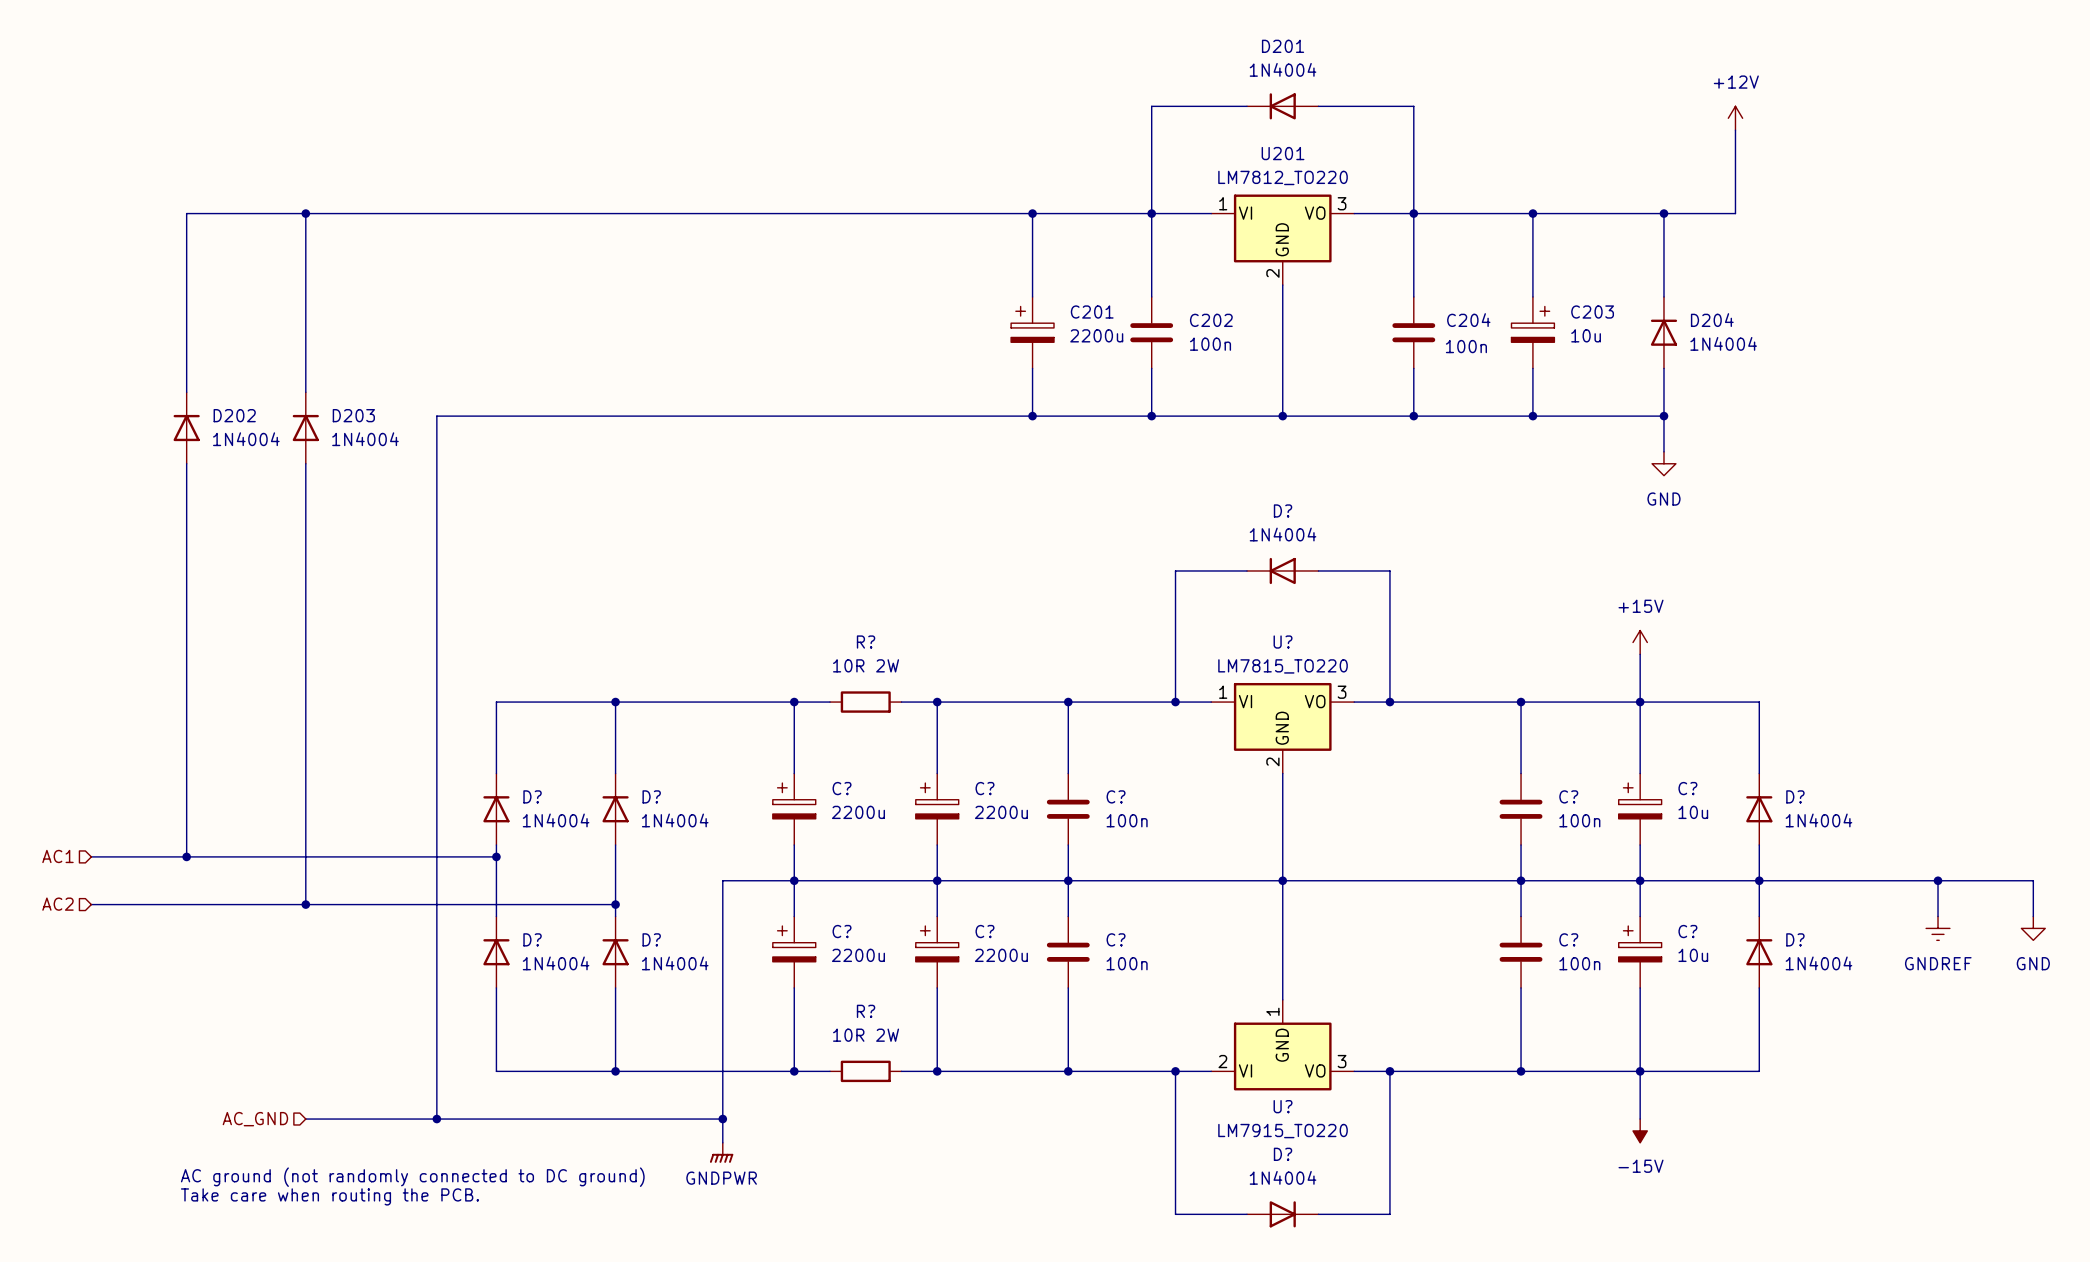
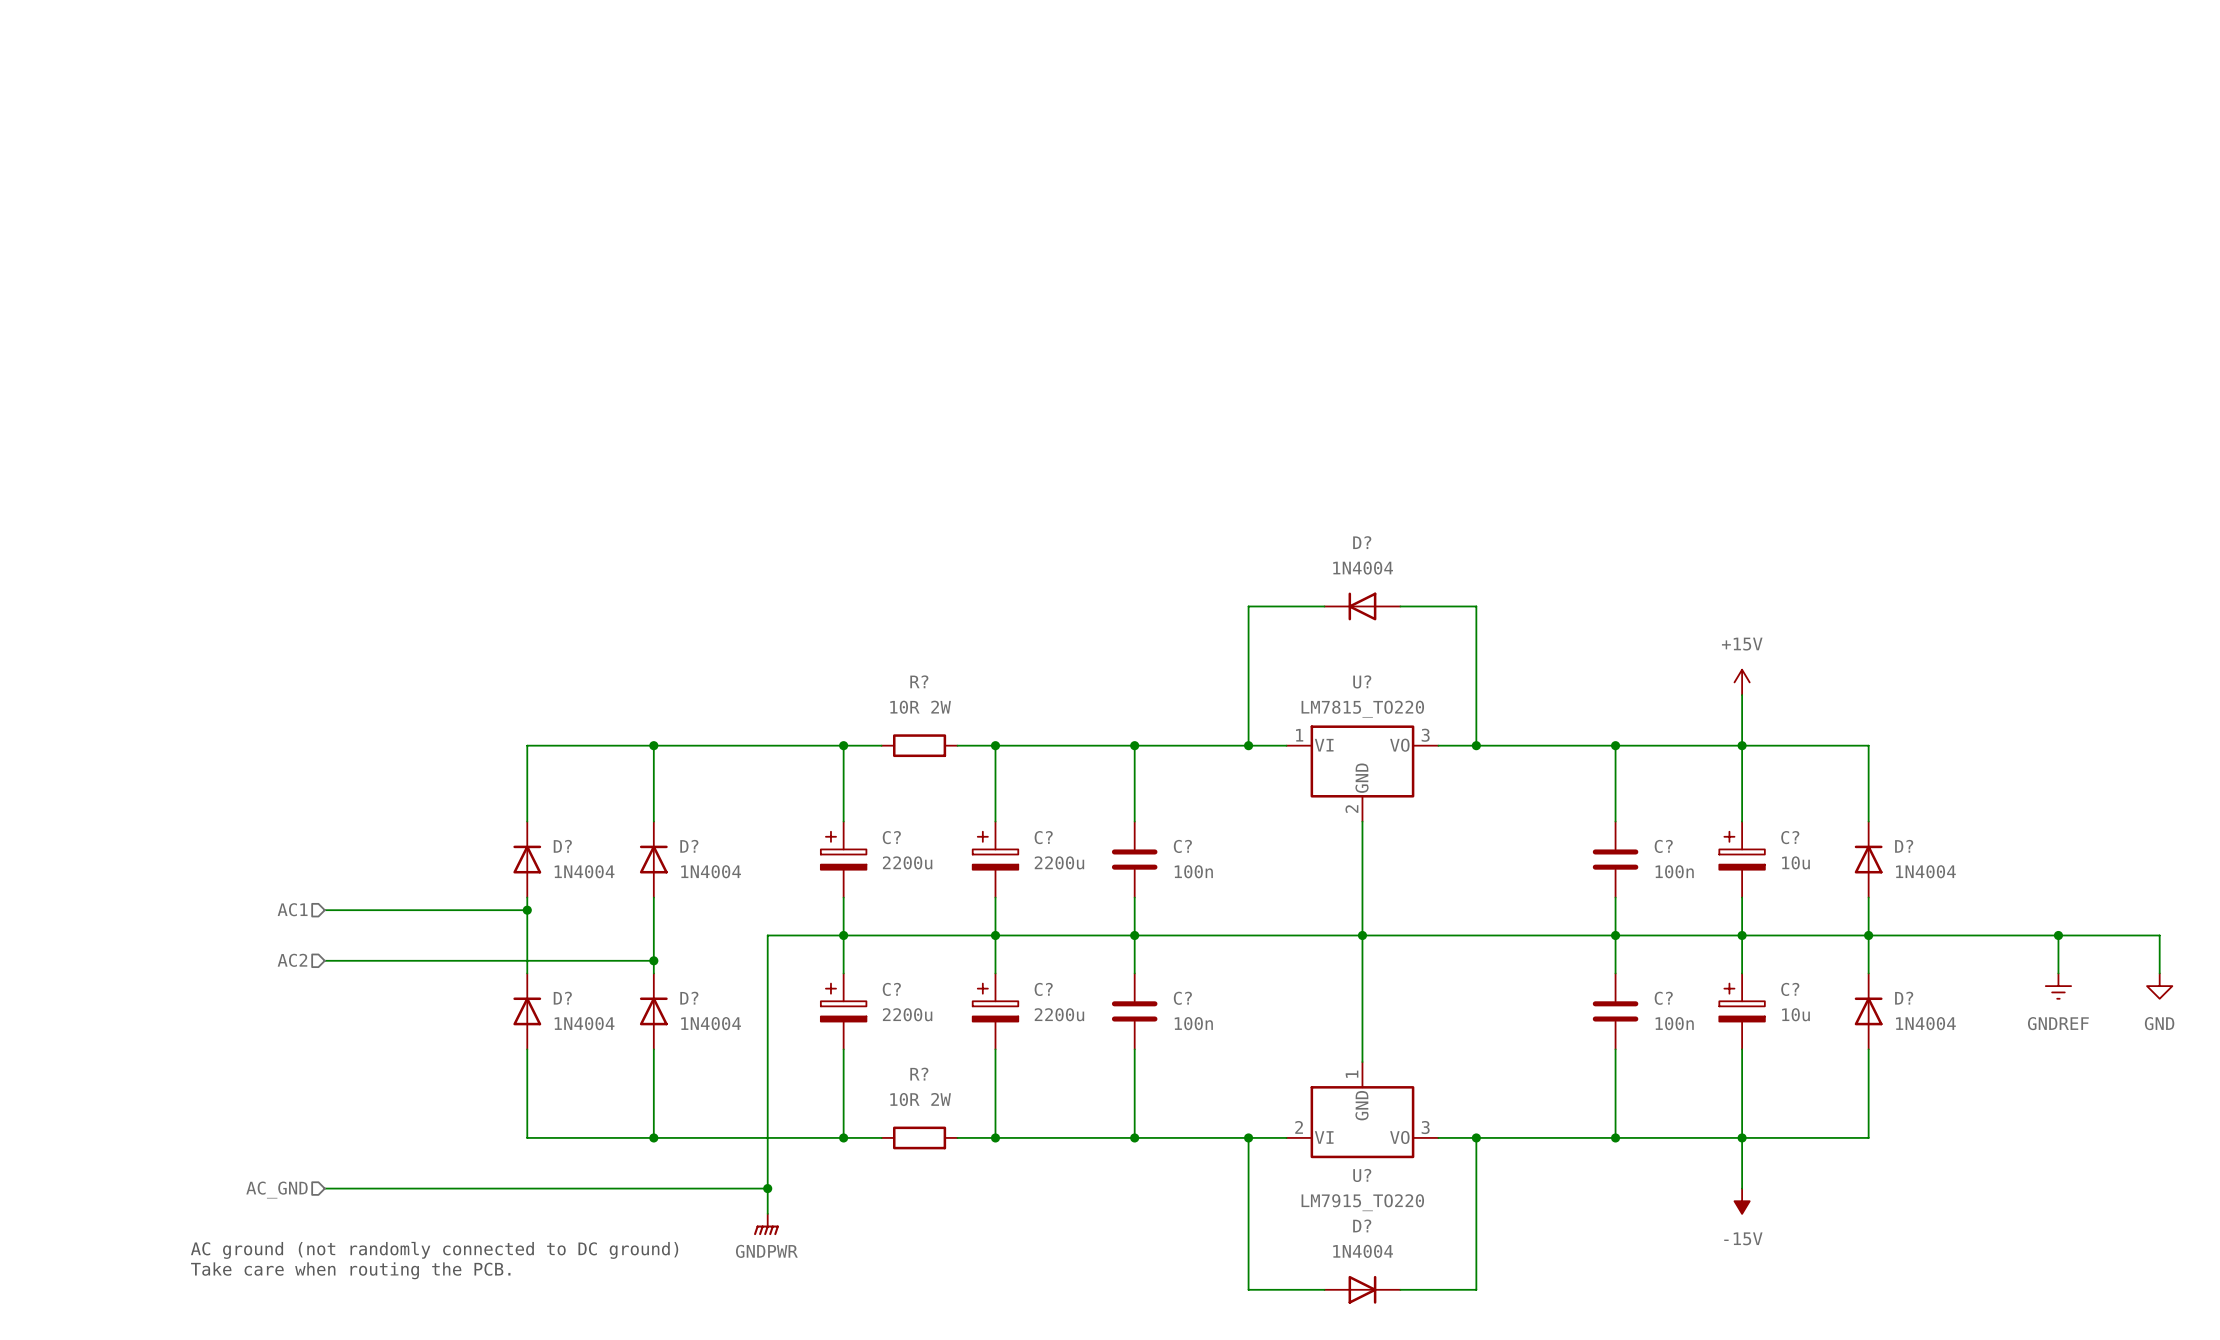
wire: (1247, 106) (1151, 106) (1151, 296) -> none
D201: 1N4004 (1282, 106) -> none
wire: (1318, 106) (1413, 106) (1413, 296) -> none
power symbol: +12V (1735, 118) -> none
wire: (1735, 130) (1735, 213) (1354, 213) -> none
wire: (305, 213) (305, 392) -> none
junction: (305, 213) -> none
wire: (1032, 213) (1032, 296) -> none
junction: (1032, 213) -> none
junction: (1151, 213) -> none
wire: (1211, 213) (186, 213) (186, 392) -> none
junction: (1413, 213) -> none
wire: (1532, 213) (1532, 296) -> none
junction: (1532, 213) -> none
wire: (1663, 213) (1663, 296) -> none
junction: (1663, 213) -> none
U201: LM7812_TO220 (1282, 239) -> none
wire: (1282, 285) (1282, 416) -> none
C201: 2200u (1032, 332) -> none
C202: 100n (1151, 332) -> none
C204: 100n (1413, 332) -> none
C203: 10u (1532, 332) -> none
D204: 1N4004 (1663, 332) -> none
wire: (1032, 368) (1032, 416) -> none
wire: (1151, 368) (1151, 416) -> none
wire: (1413, 368) (1413, 416) -> none
wire: (1532, 368) (1532, 416) -> none
wire: (1663, 368) (1663, 451) -> none
junction: (1032, 416) -> none
junction: (1151, 416) -> none
junction: (1282, 416) -> none
junction: (1413, 416) -> none
junction: (1532, 416) -> none
wire: (1663, 416) (436, 416) (436, 1119) -> none
junction: (1663, 416) -> none
D202: 1N4004 (186, 428) -> none
D203: 1N4004 (305, 428) -> none
wire: (186, 463) (186, 856) -> none
wire: (305, 463) (305, 904) (91, 904) -> none
power symbol: GND (1663, 463) -> none
hierarchical label position: AC1 (57, 856) -> AC1 (292, 909)
wire: (91, 856) (305, 856) -> none
junction: (186, 856) -> none
hierarchical label position: AC2 (57, 904) -> AC2 (292, 960)
junction: (305, 904) -> none
junction: (436, 1119) -> none

